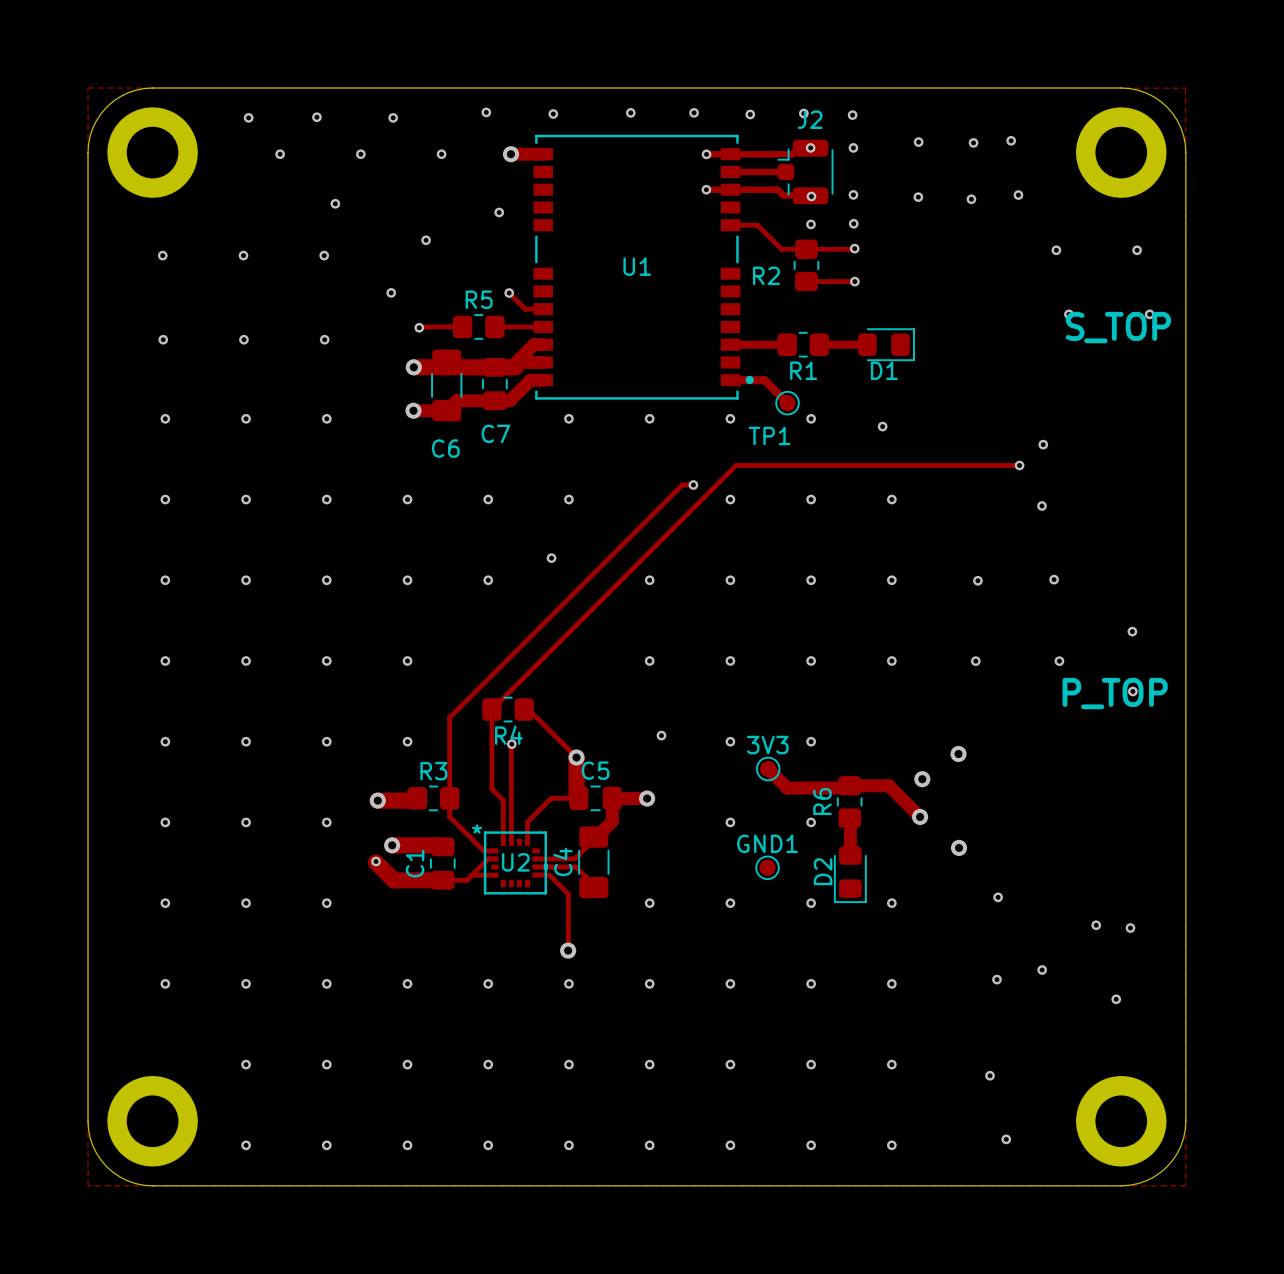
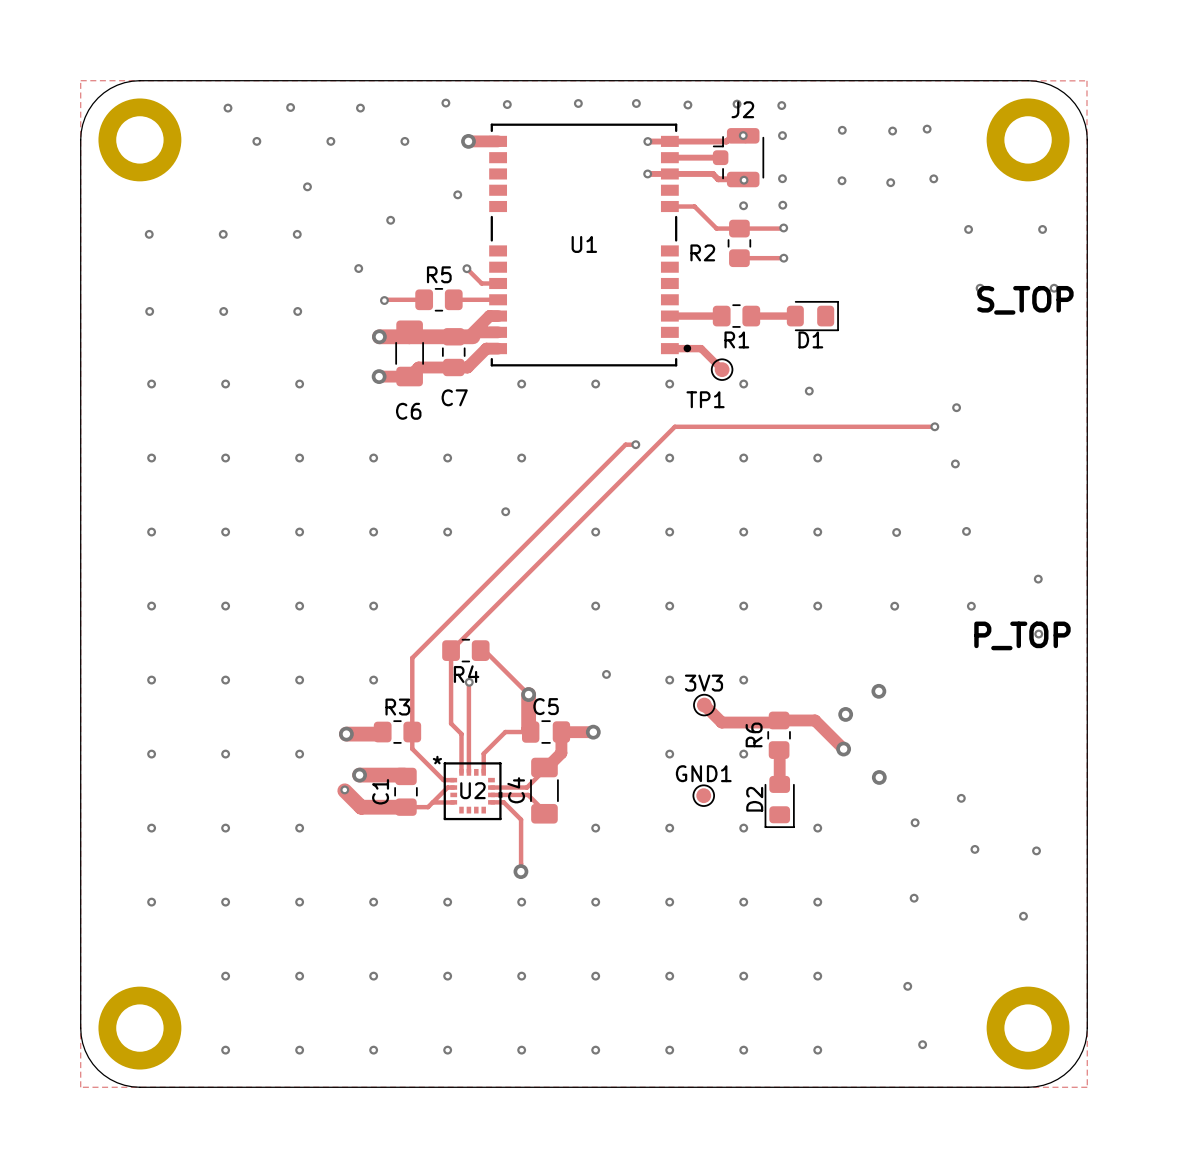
via: none -> (961, 798)
via: (1096, 925) -> none
via: none -> (974, 849)
via: (1042, 969) -> none

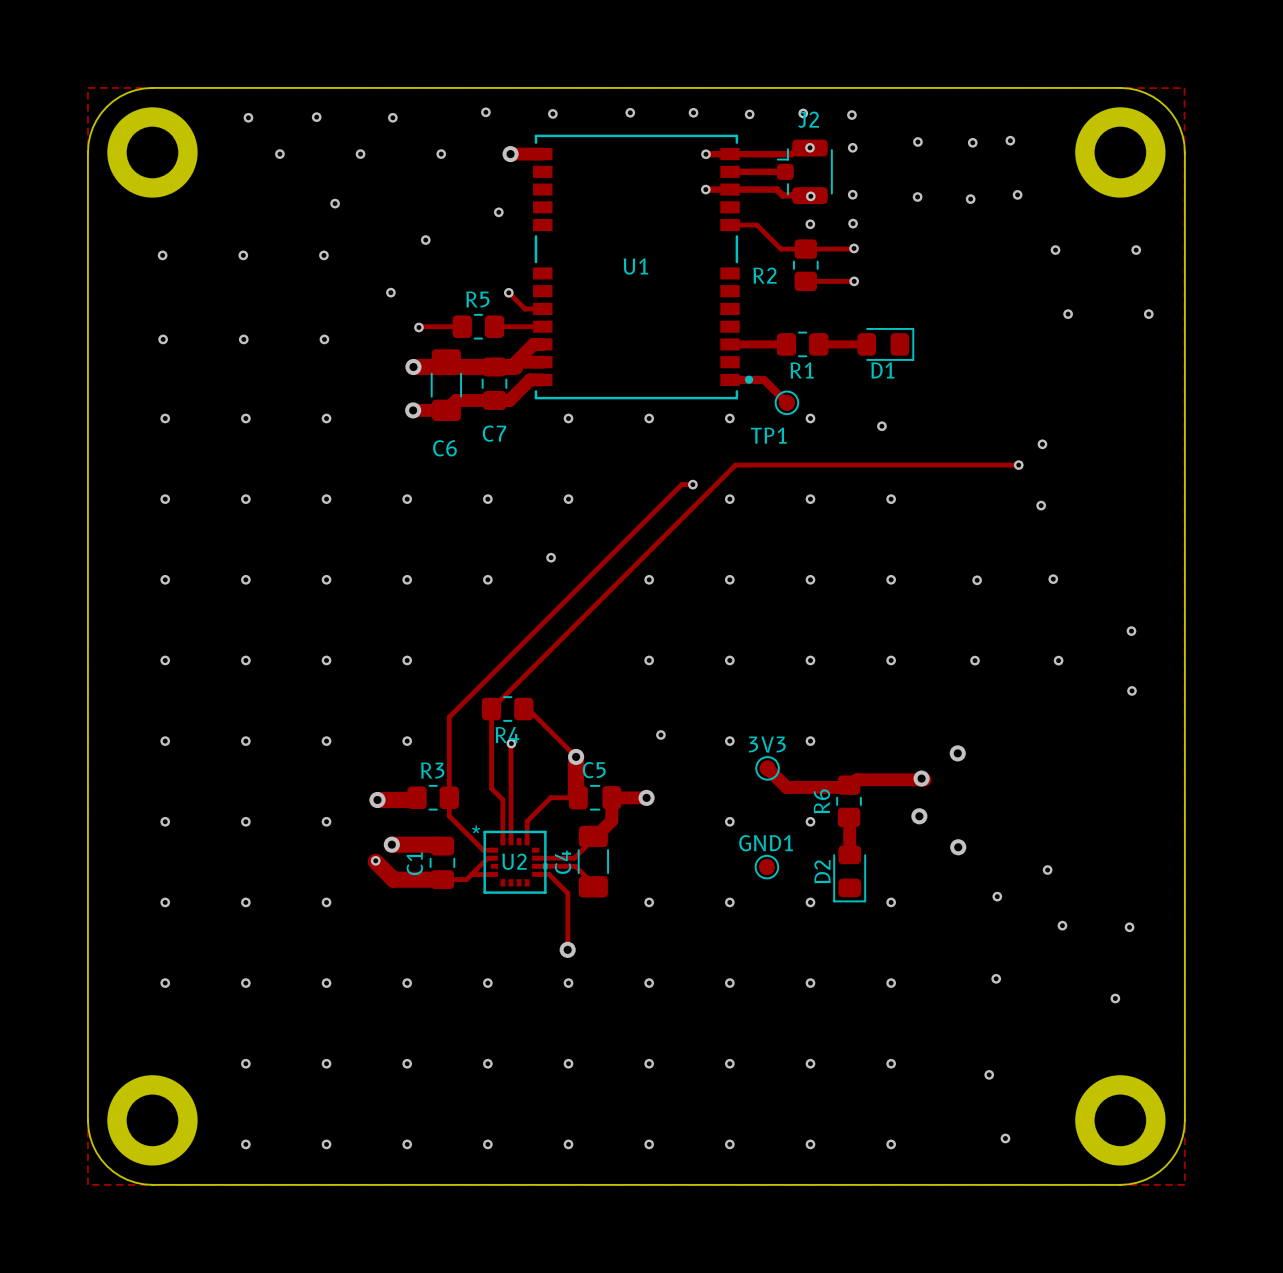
text: S_TOP (1025, 300) -> none
text: P_TOP (1022, 635) -> none
track: none -> (925, 779) (857, 779) (849, 787)
track: (779, 720) (815, 720) (843, 749) -> none

